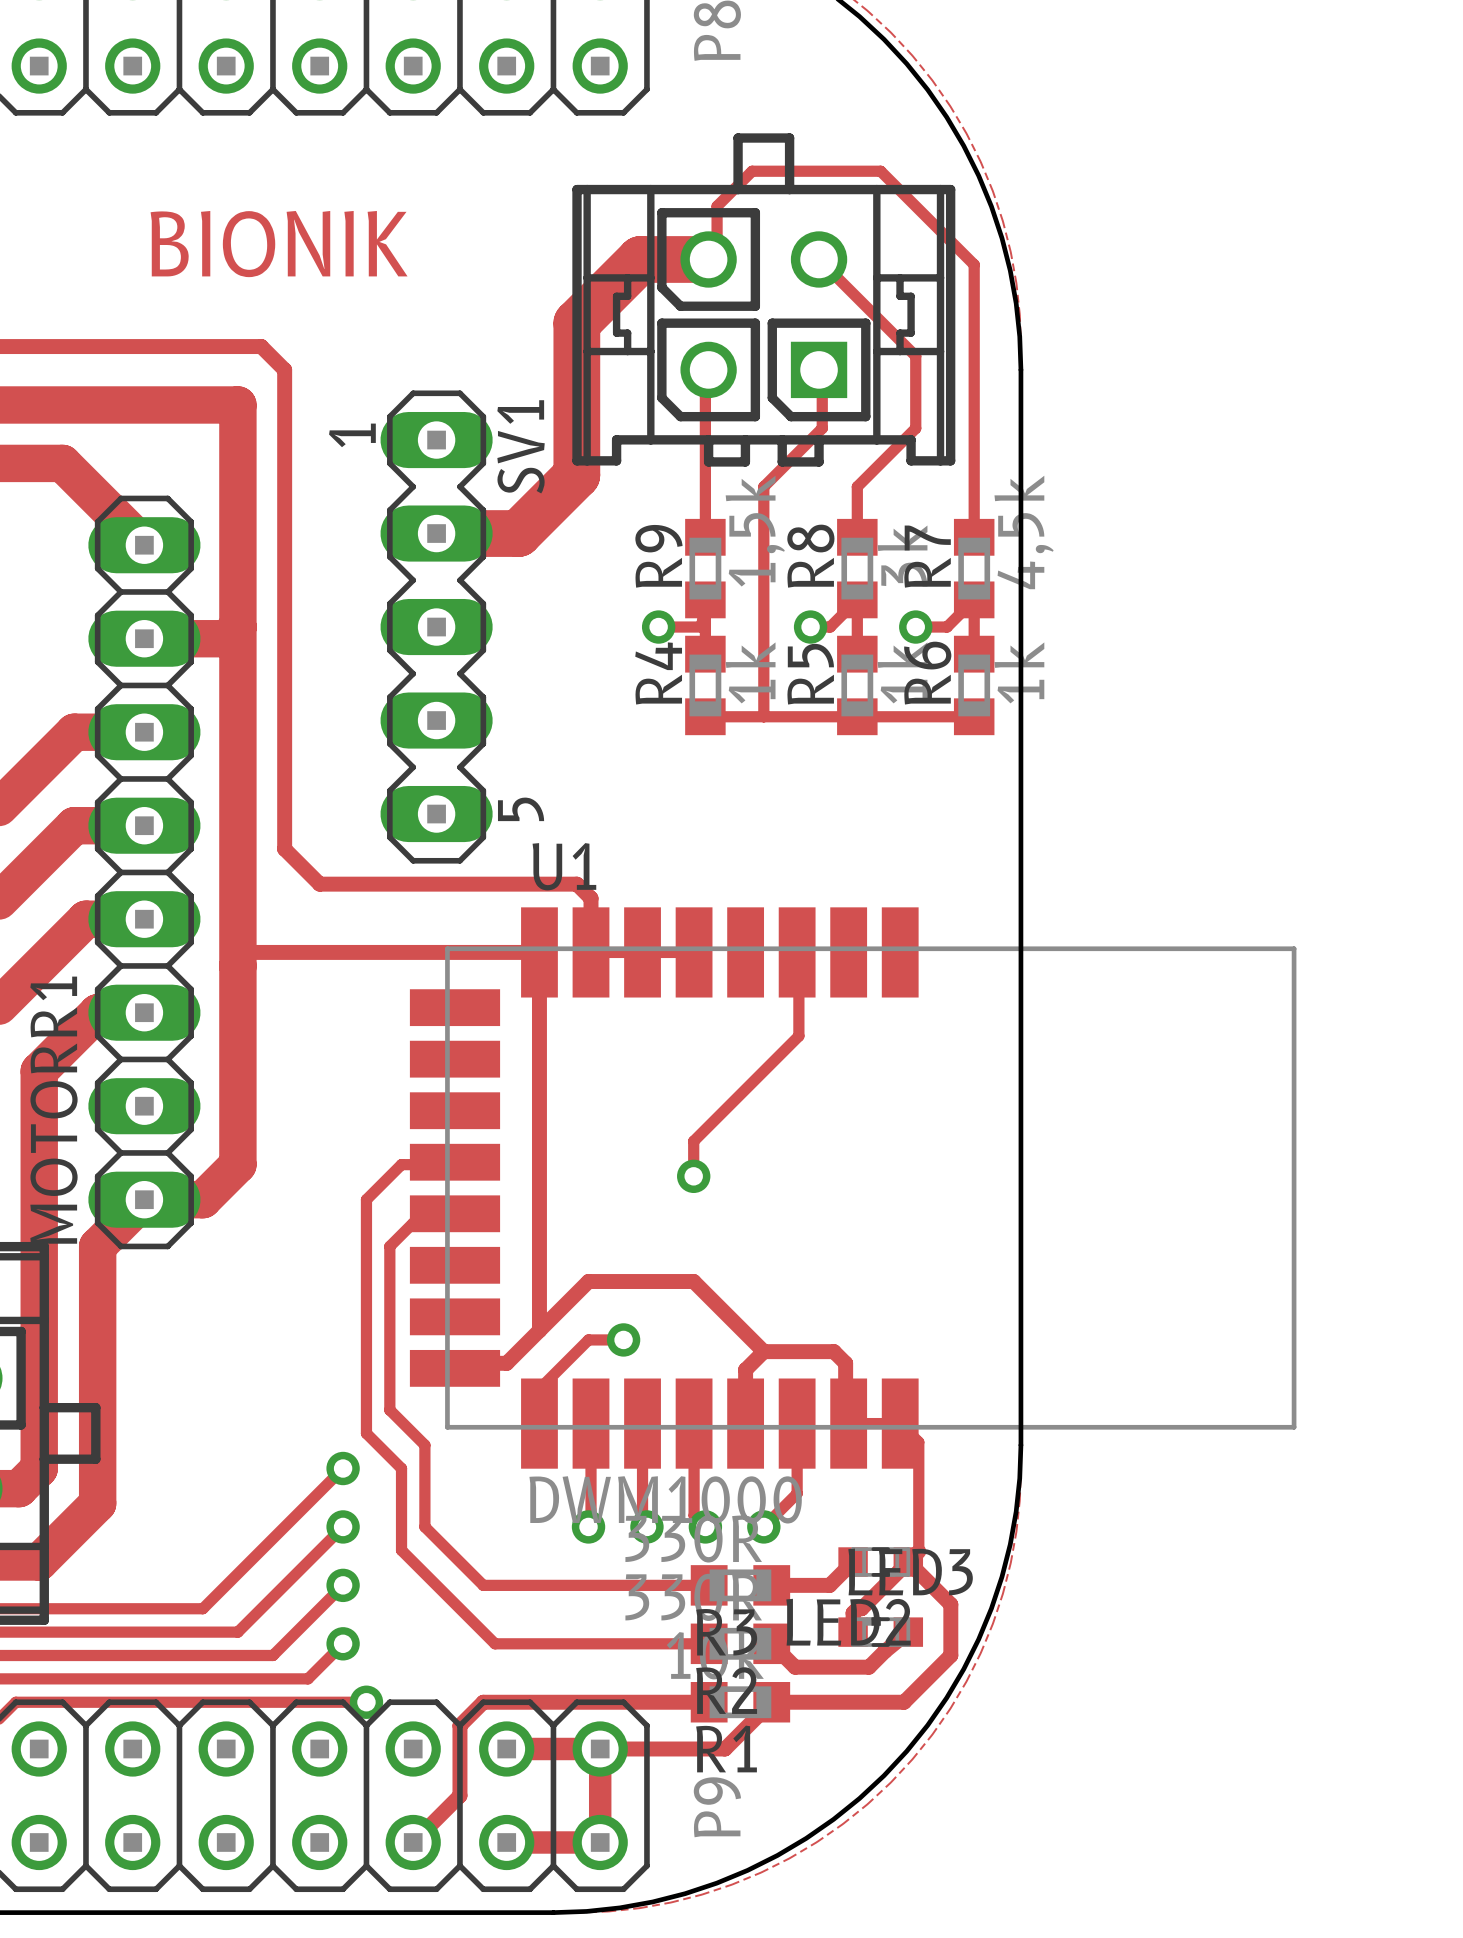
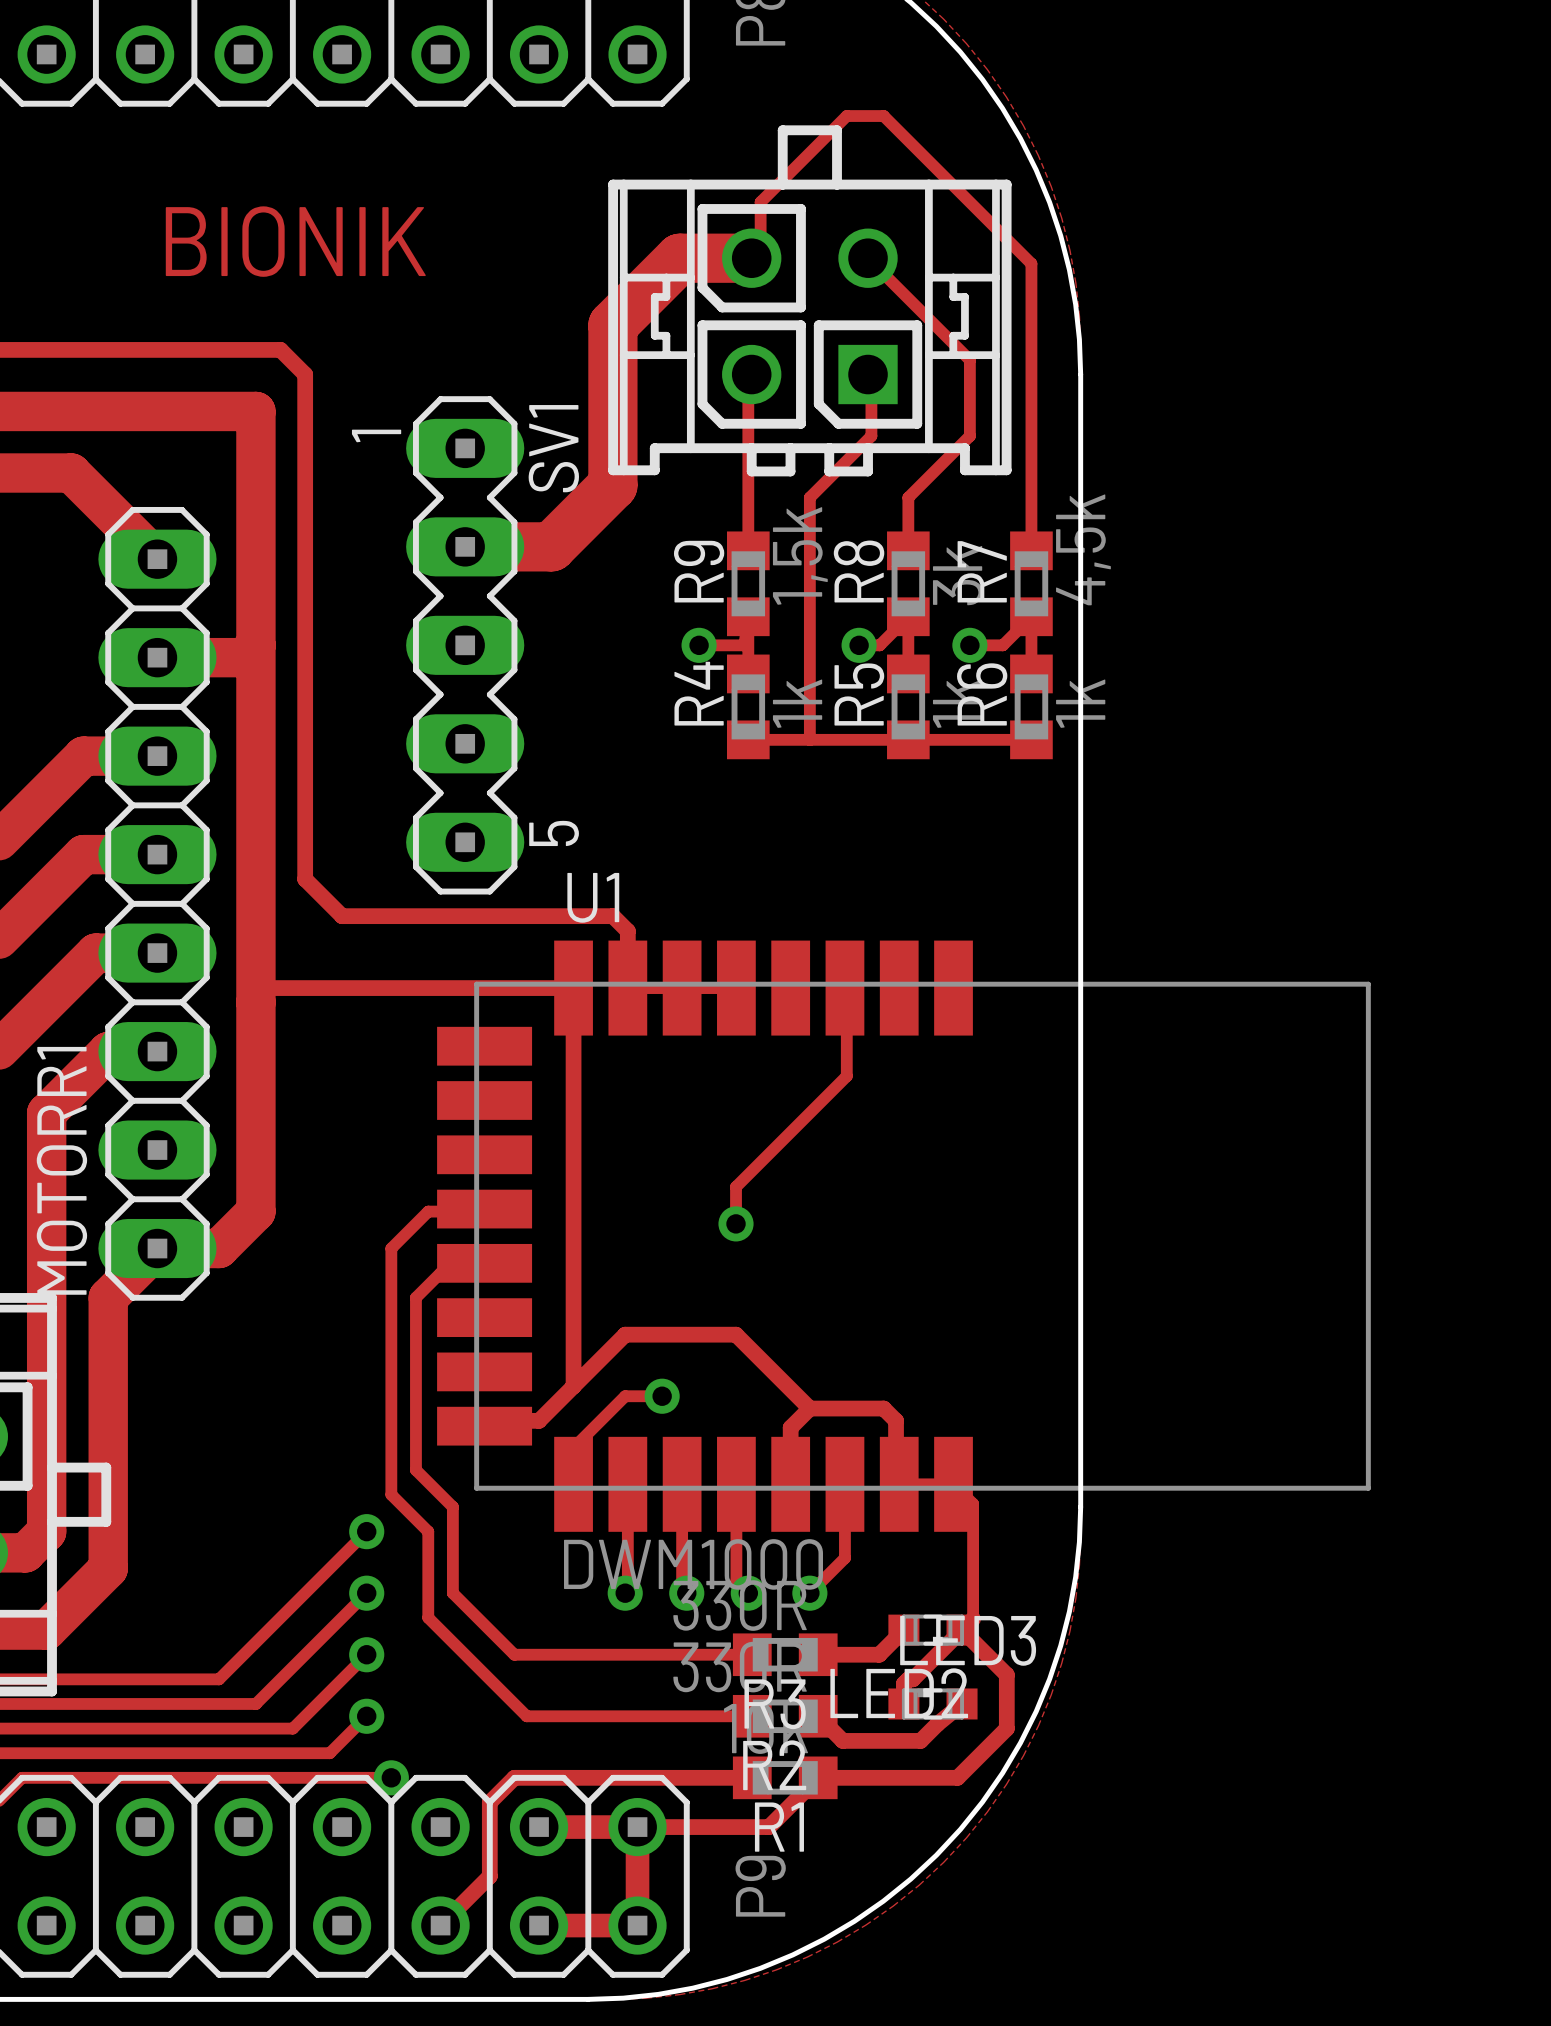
track: (752, 171) (880, 171) -> (797, 165) (846, 116) (883, 116) (932, 165)

